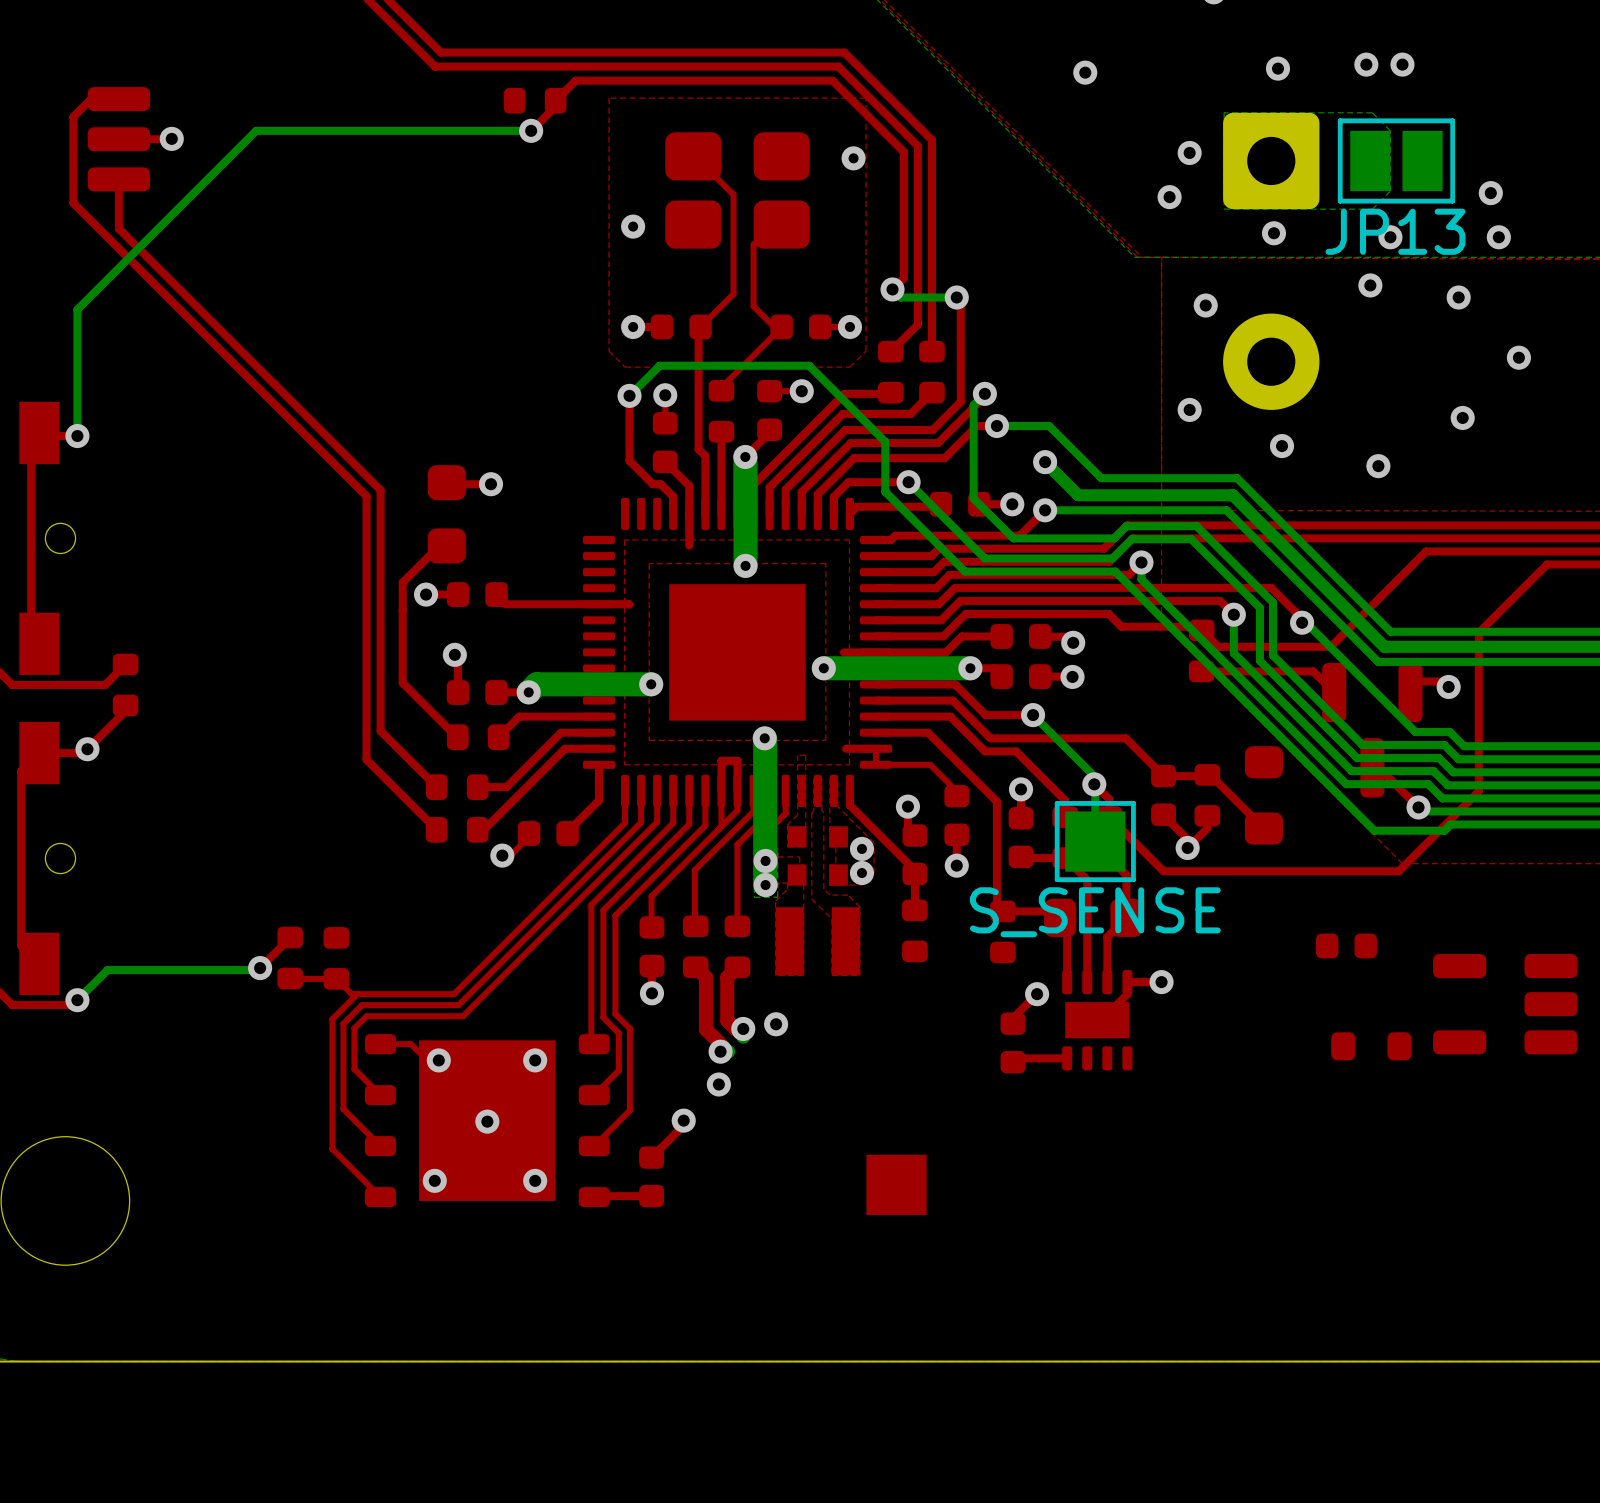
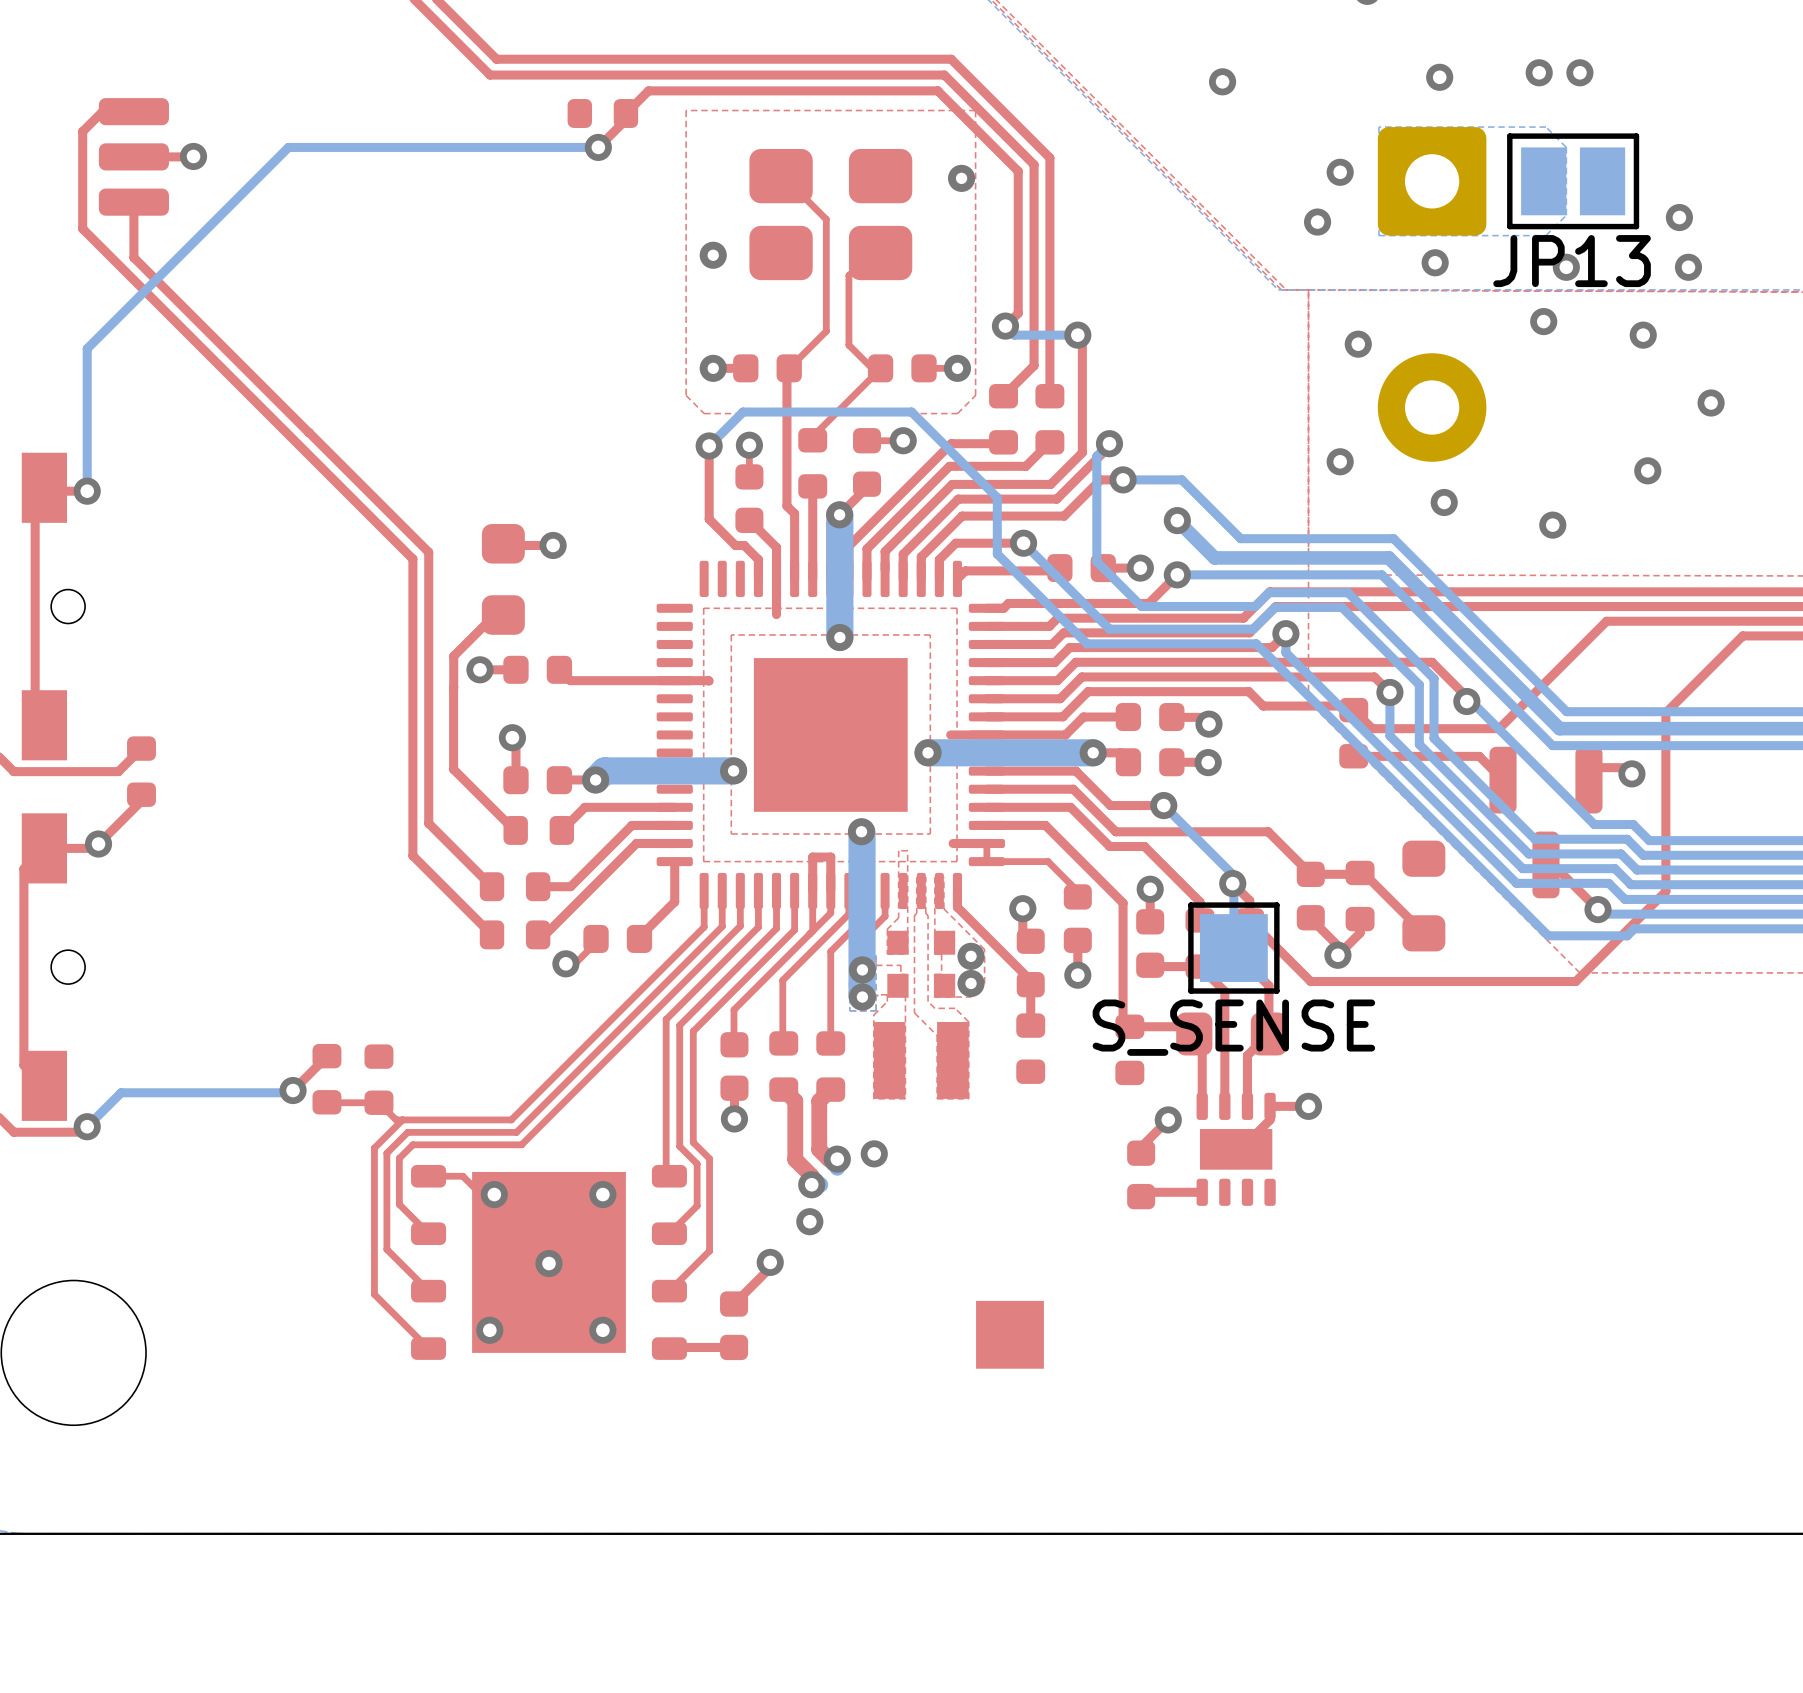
part: (1346, 945) -> none
part: (1505, 1004) -> none
part: (1371, 1046) -> none

